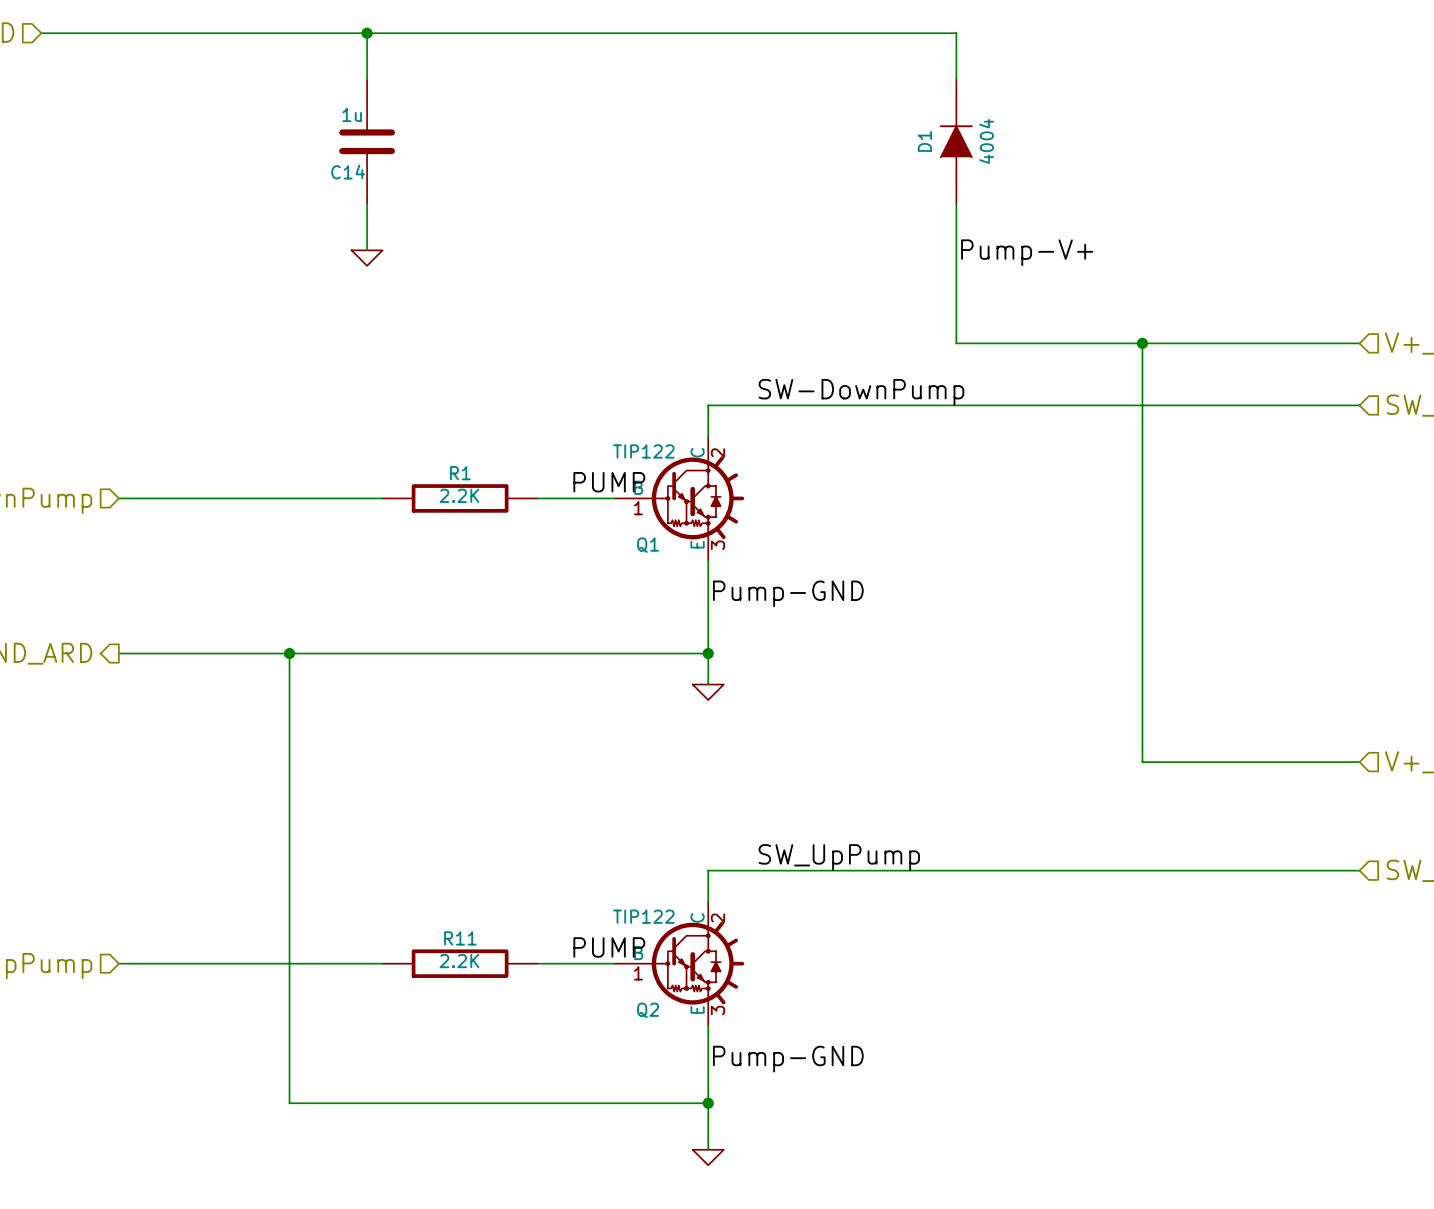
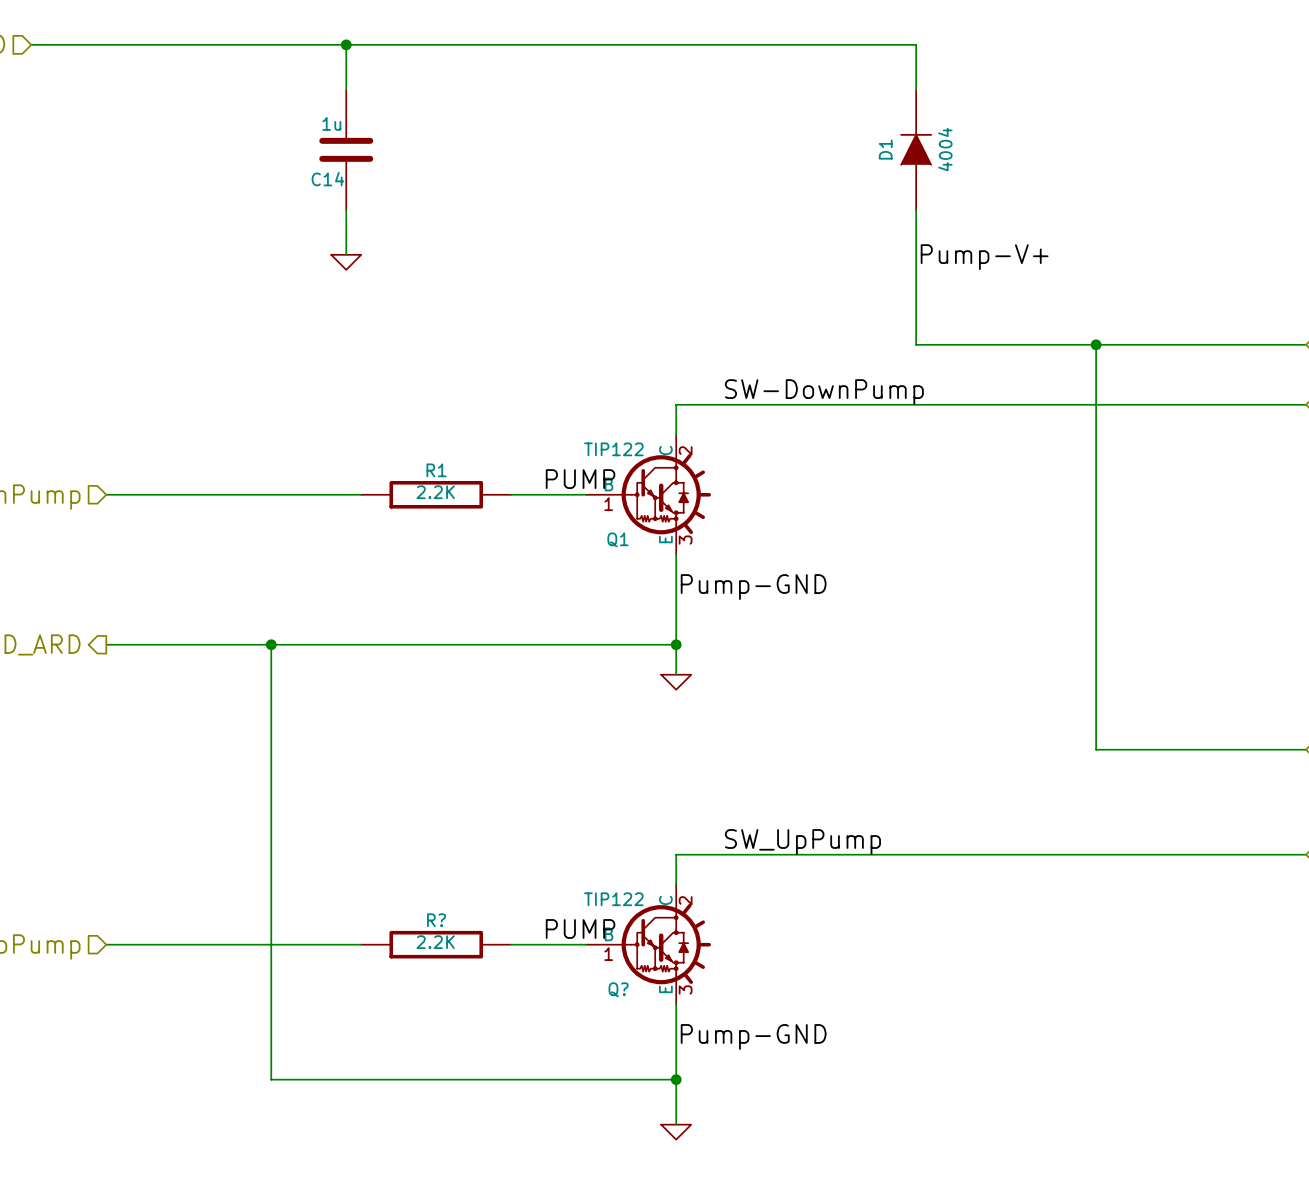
R11 name: R11 (460, 938) -> R? (436, 920)
Q2 name: Q2 (648, 1010) -> Q? (618, 989)

